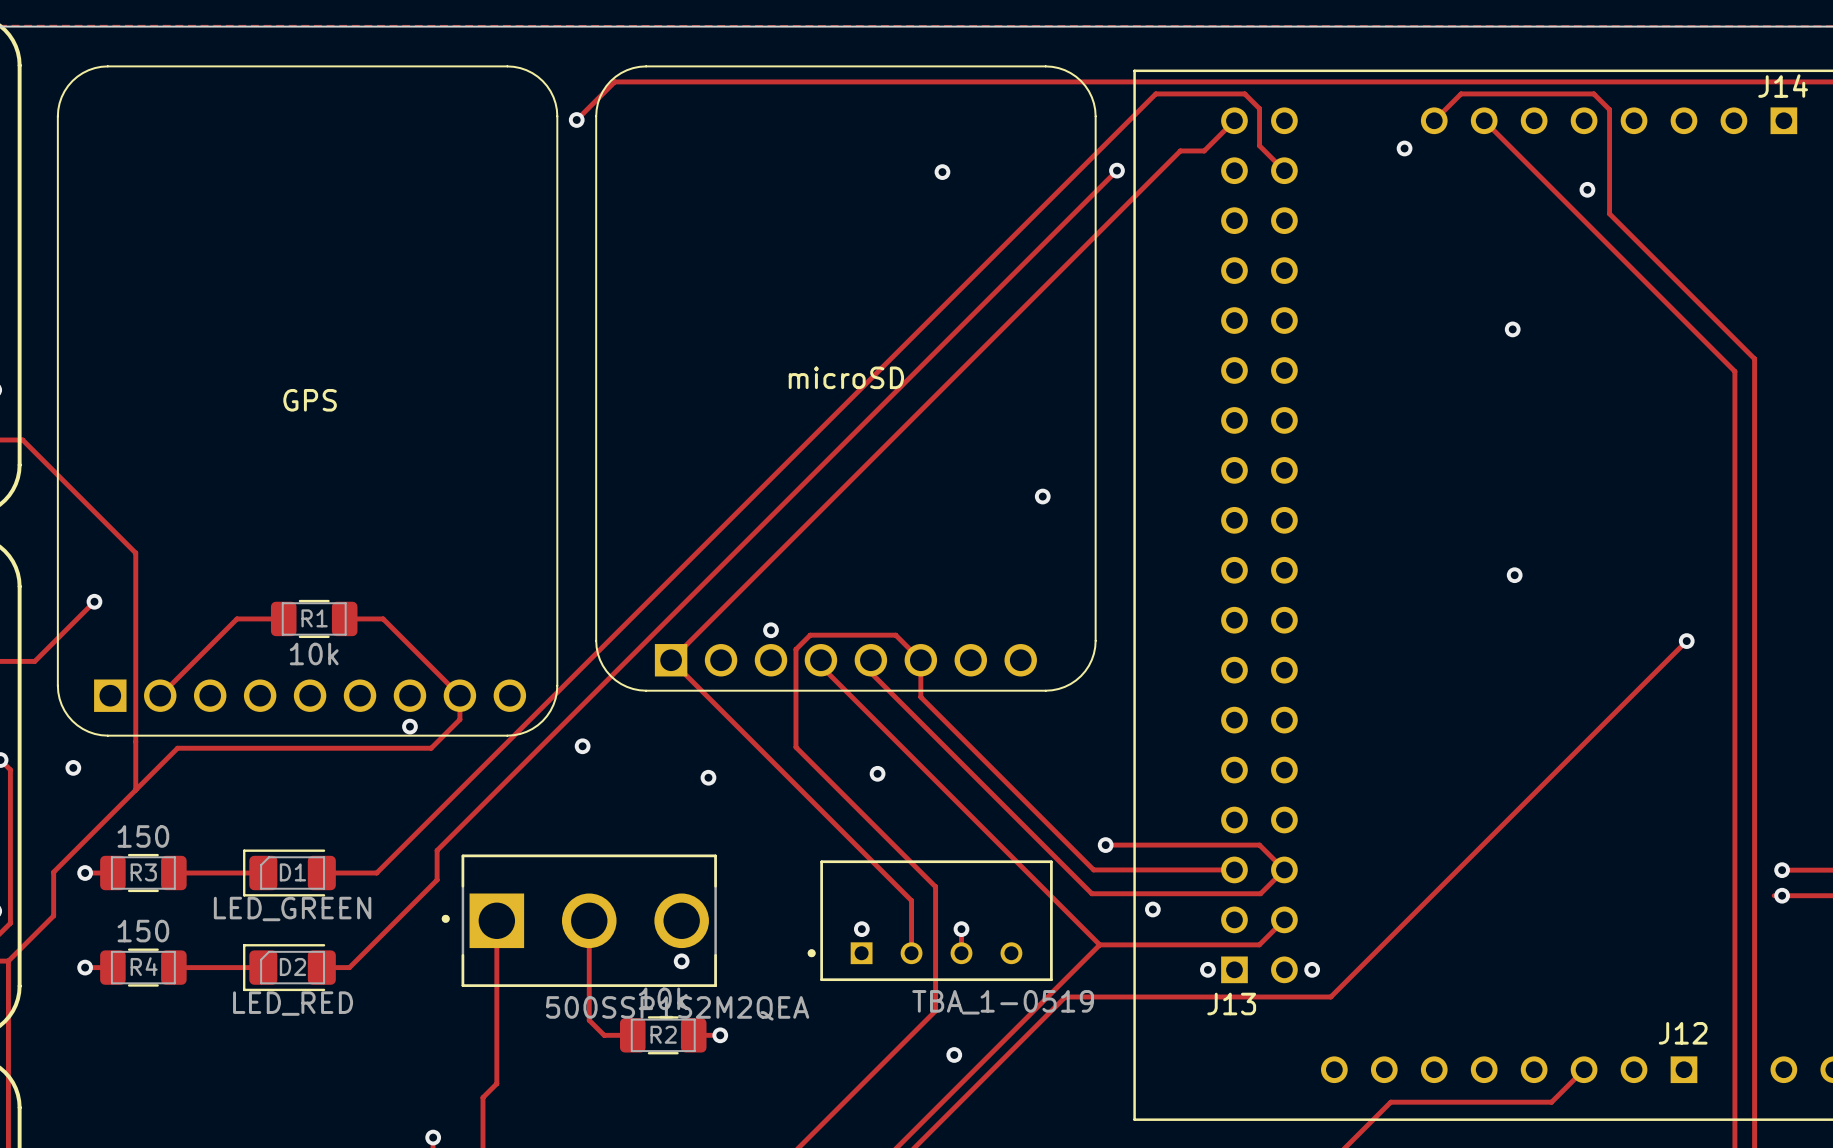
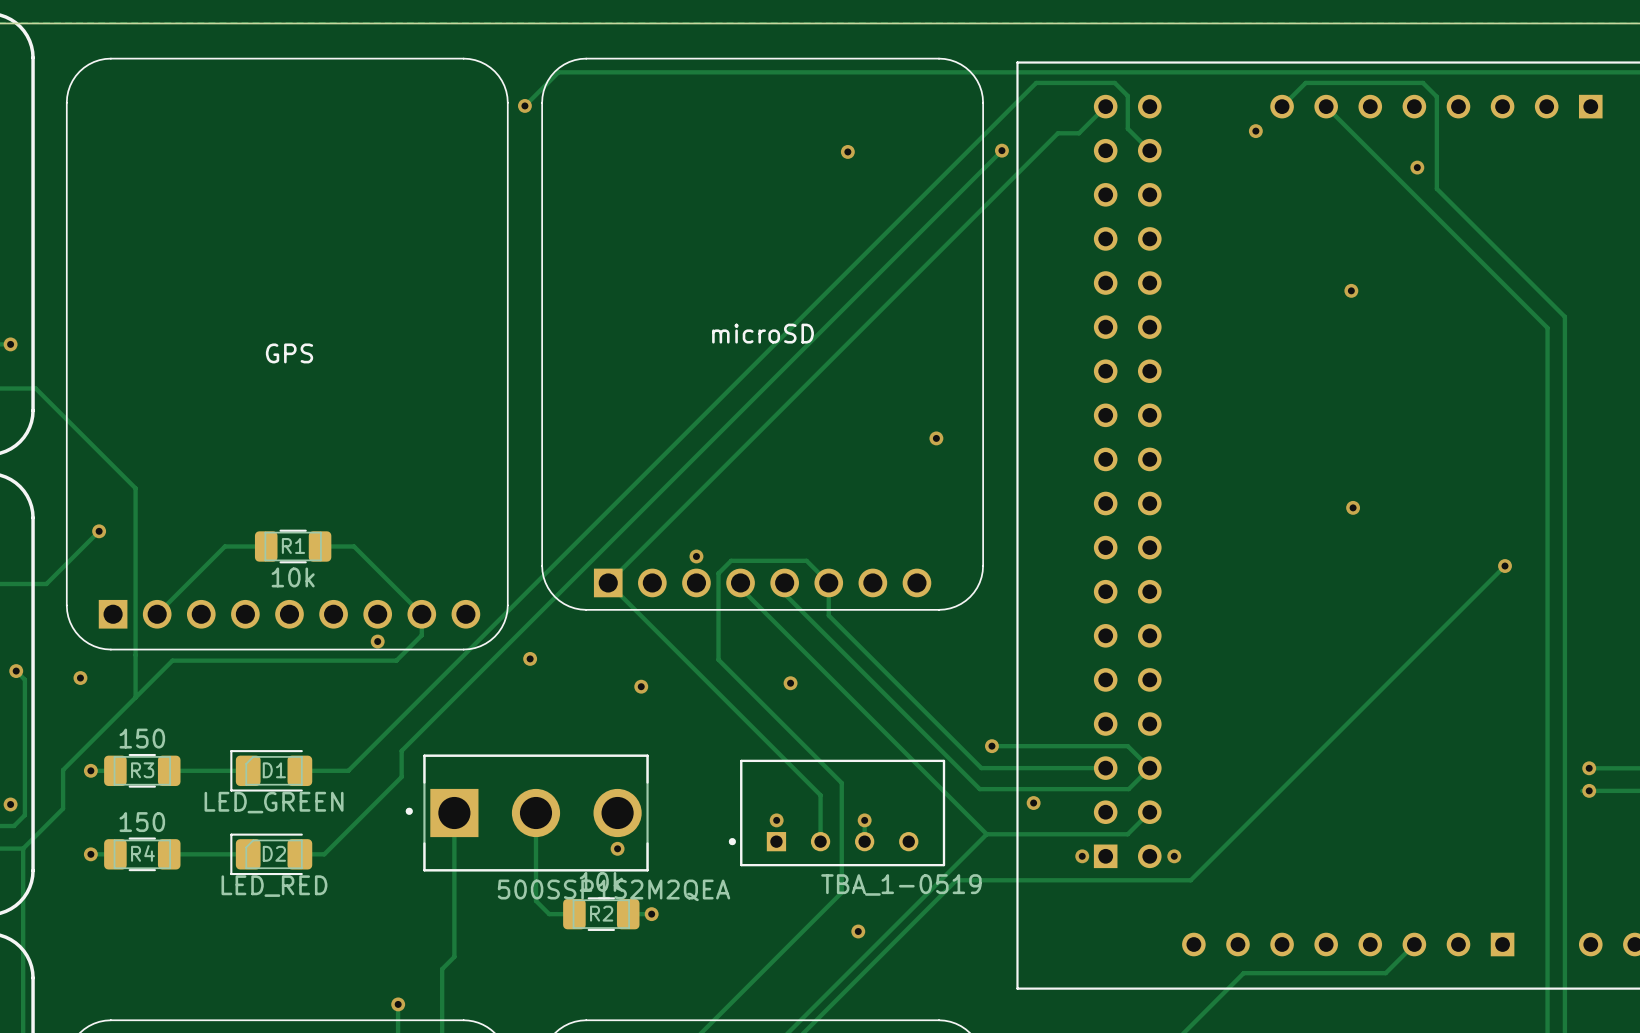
text: J14 (1783, 86) -> none
text: J13 (1231, 1004) -> none
text: J12 (1683, 1033) -> none

